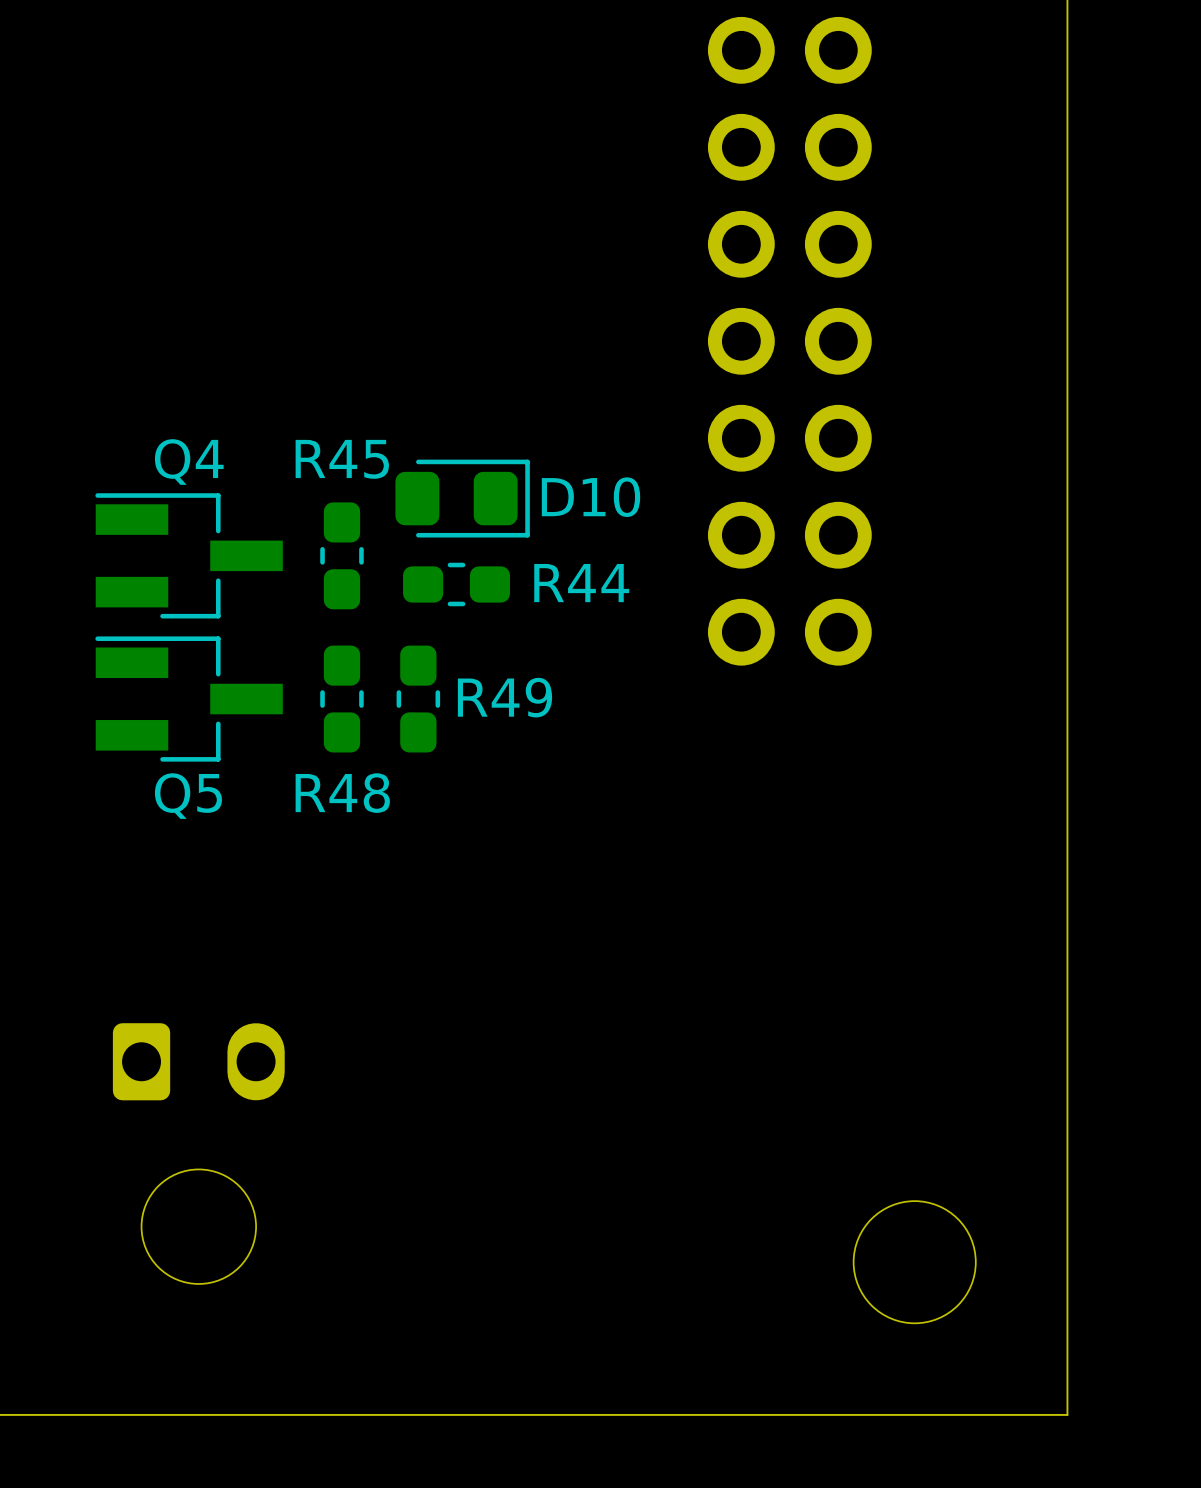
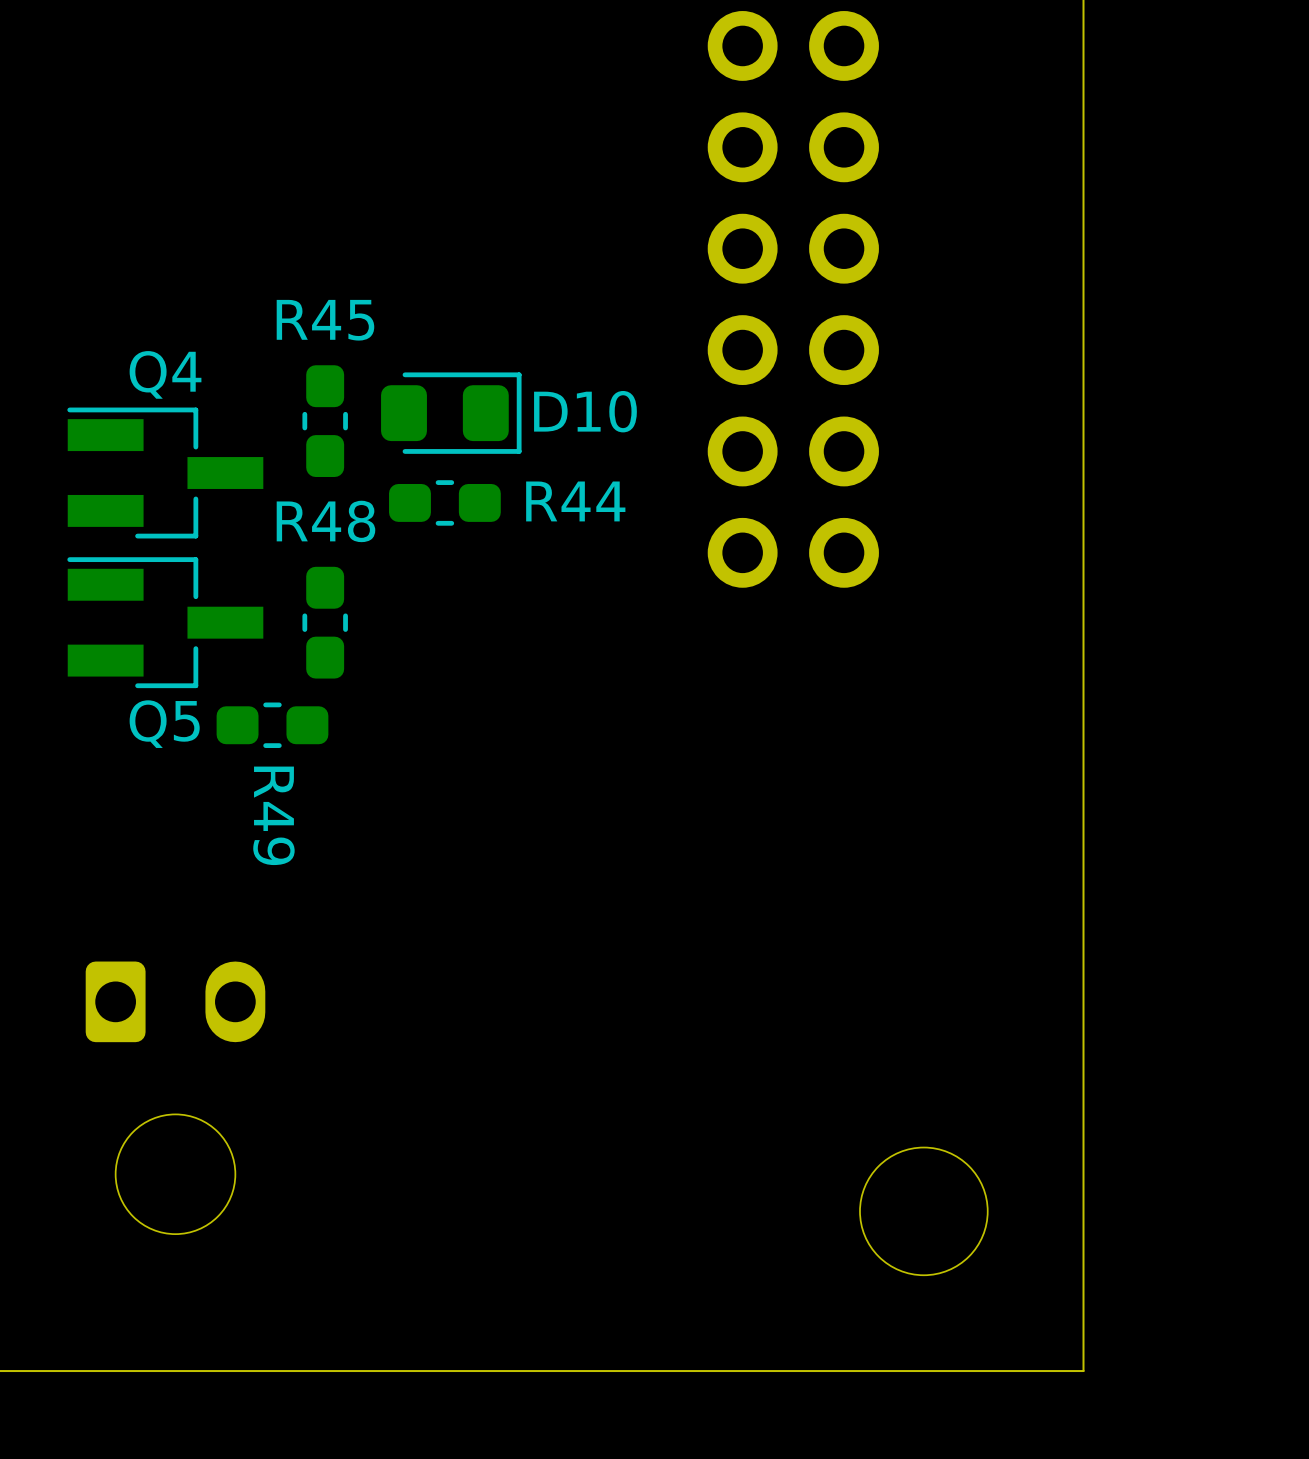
R45 position: (341, 555) -> (325, 421)
R49 rotation: 0° (418, 699) -> 90° clockwise (272, 725)
R49 position: (418, 699) -> (272, 725)
R48 name position: R48 (342, 793) -> R48 (325, 521)

